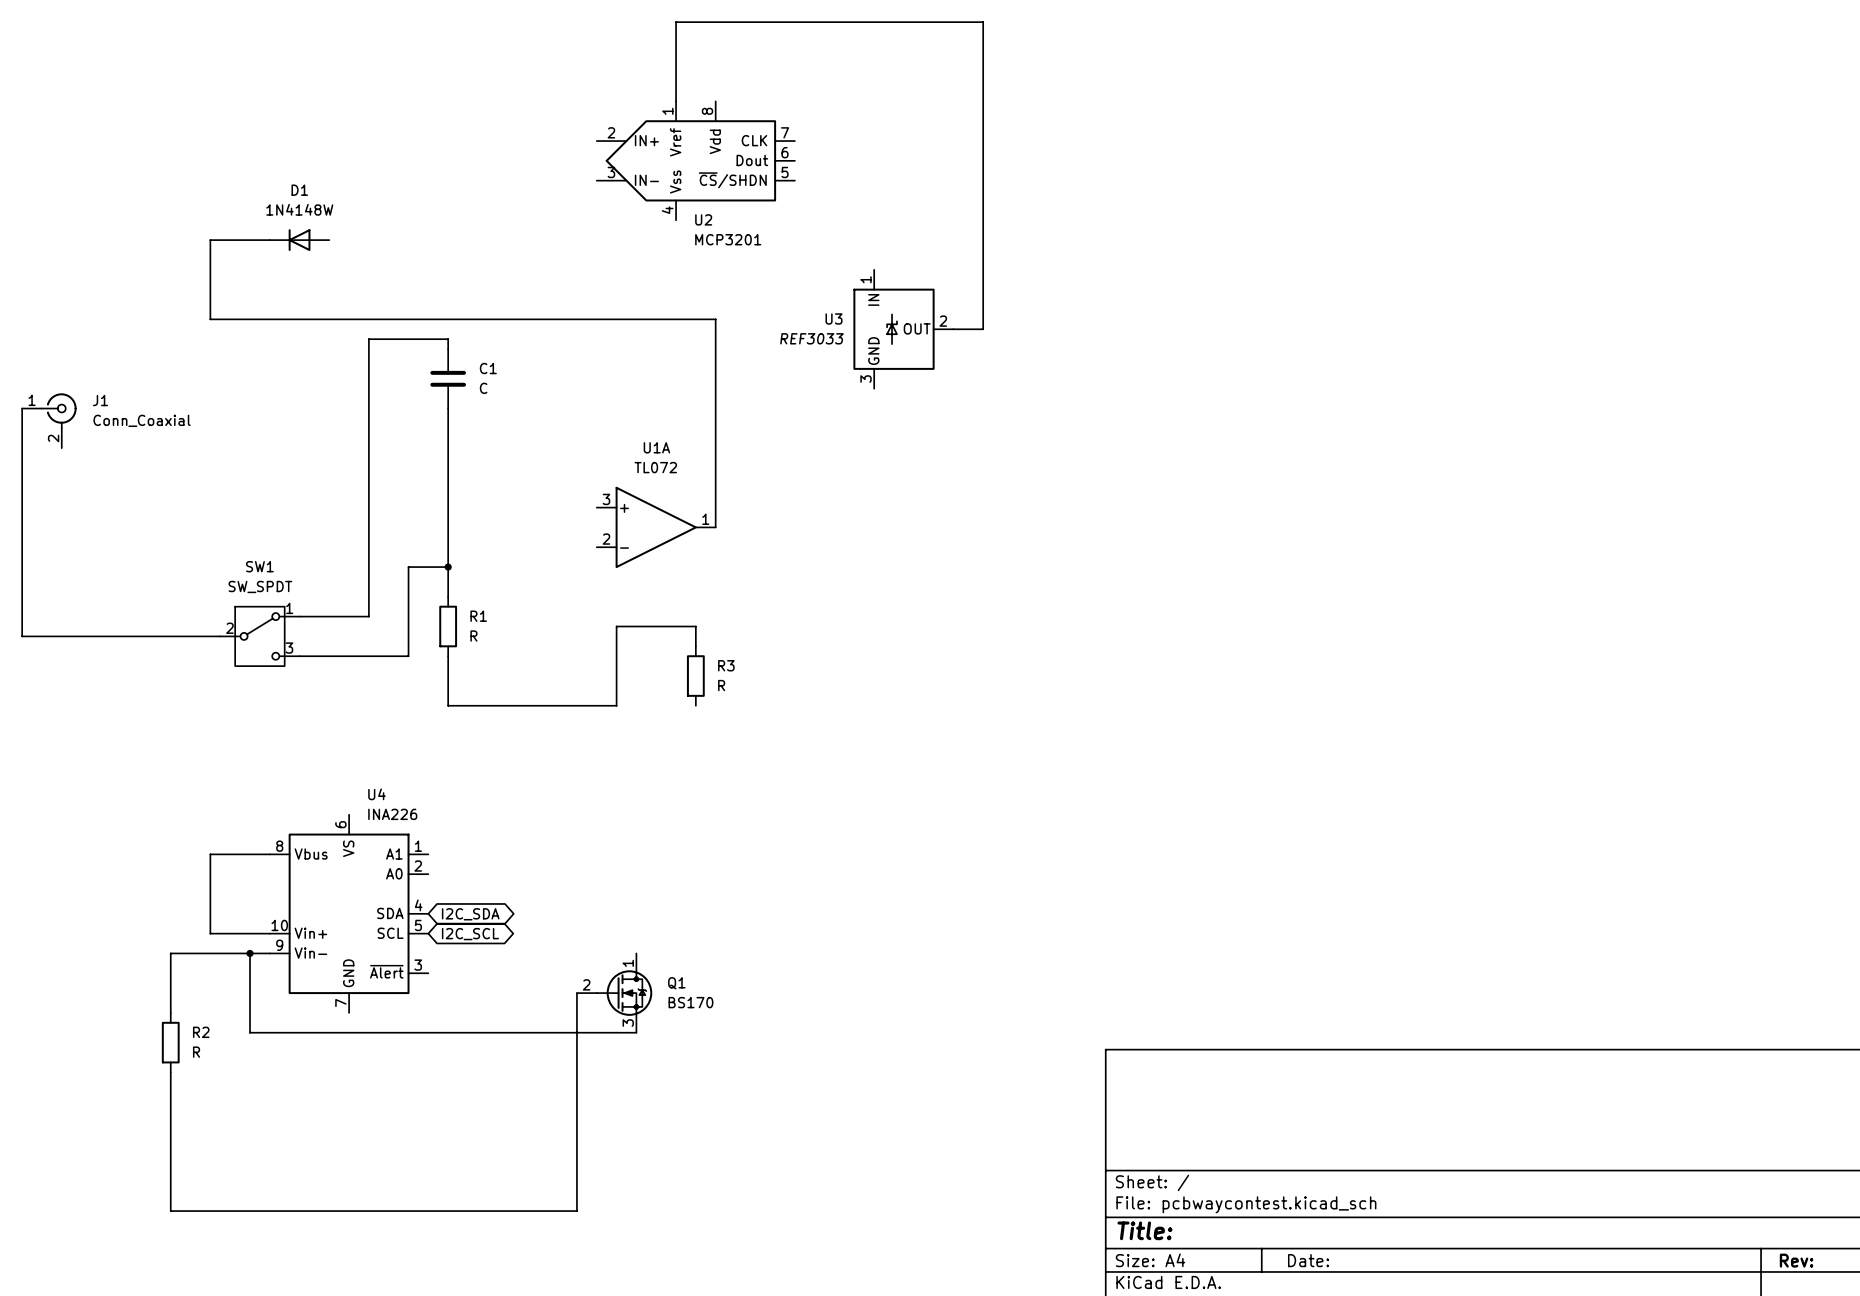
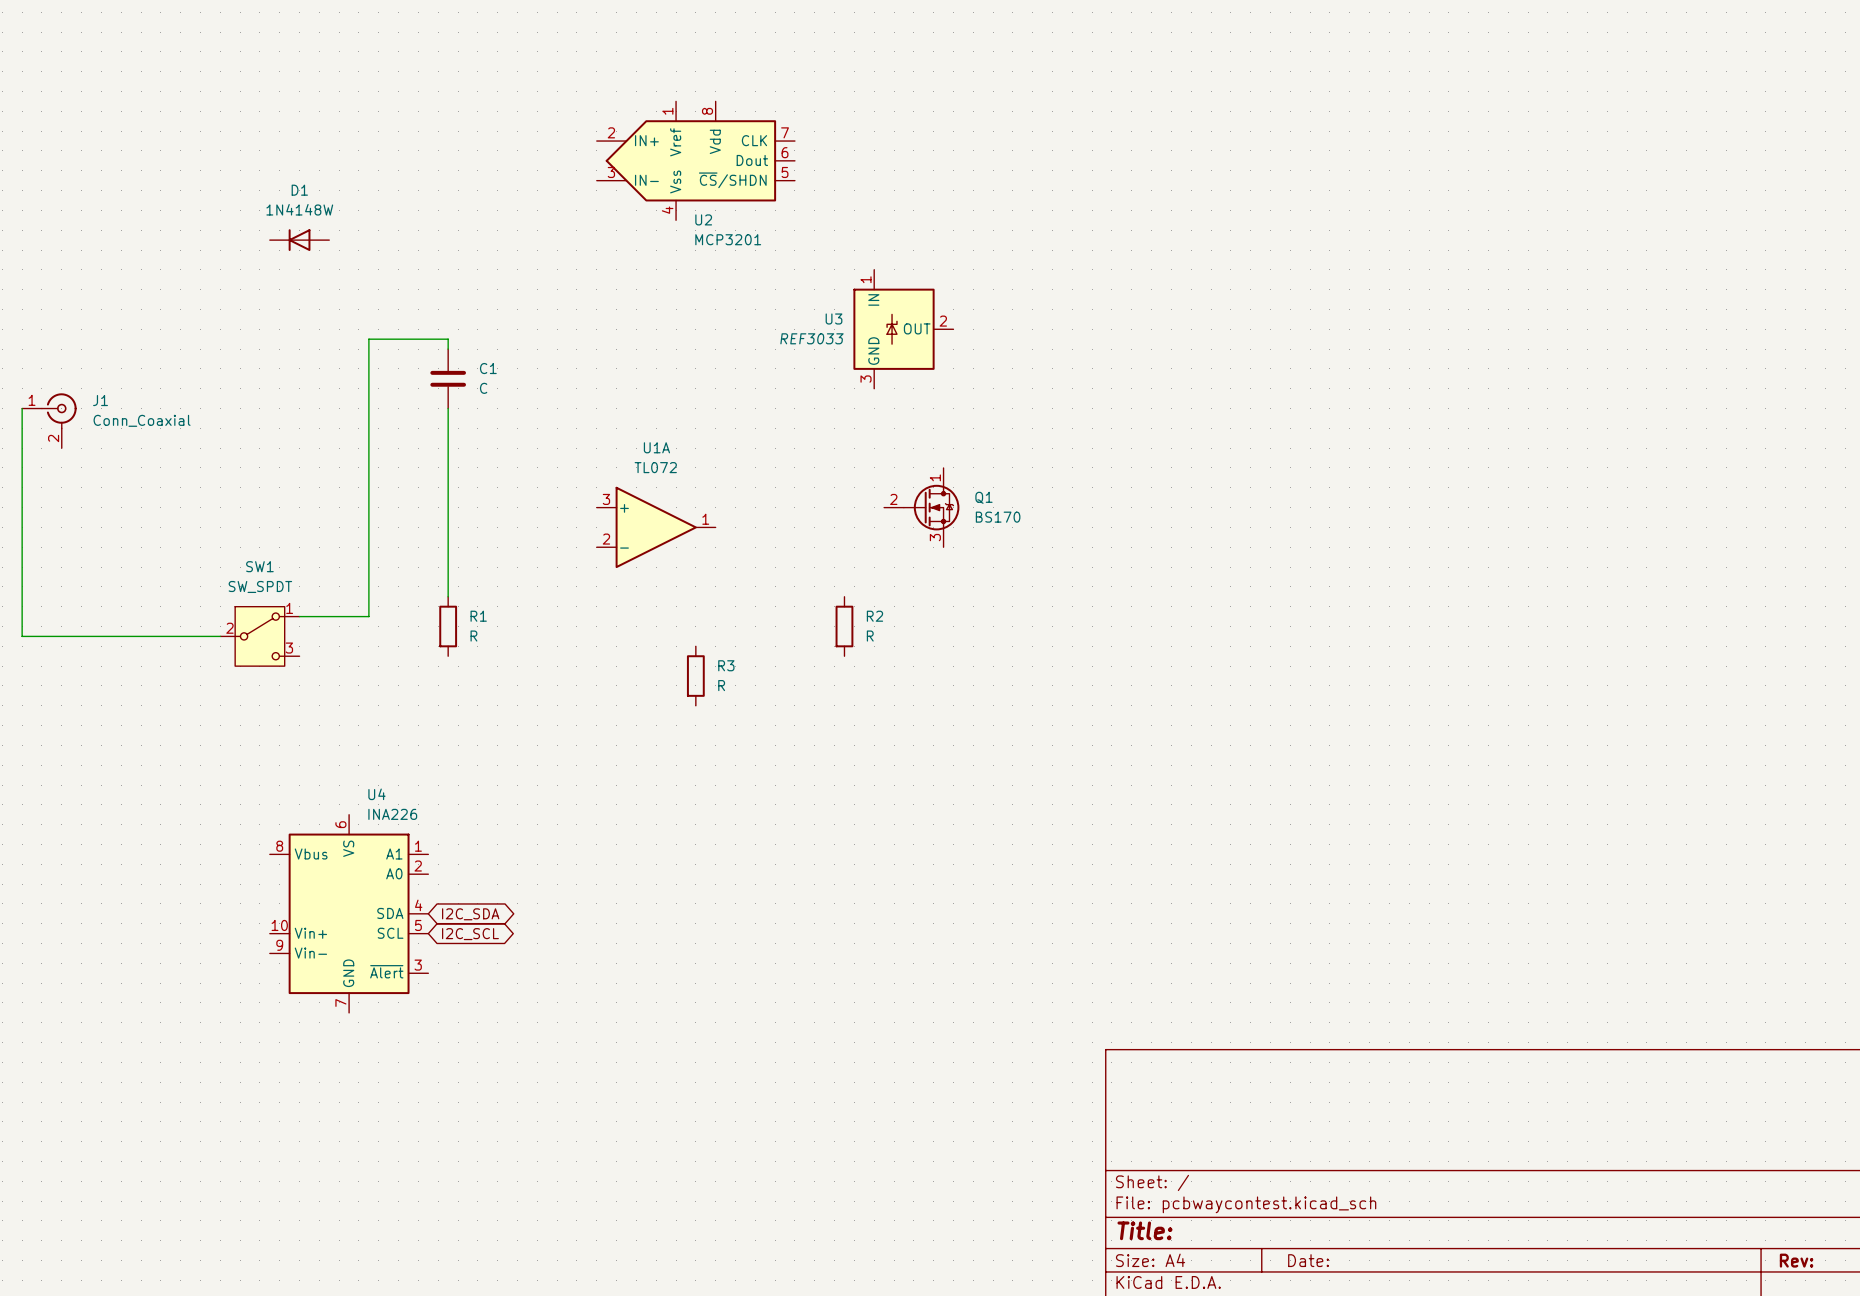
wire: (676, 101) (676, 22) (983, 22) (983, 329) (953, 329) -> none
wire: (269, 240) (210, 240) (210, 319) (715, 319) (715, 527) -> none
wire: (448, 567) (408, 567) (408, 656) (299, 656) -> none
junction: (448, 567) -> none
wire: (695, 646) (695, 626) (616, 626) (616, 705) (448, 705) (448, 656) -> none
wire: (269, 854) (210, 854) (210, 933) (269, 933) -> none
wire: (250, 953) (250, 1032) (636, 1032) -> none
junction: (250, 953) -> none
wire: (269, 953) (170, 953) (170, 1012) -> none
wire: (576, 993) (576, 1211) (170, 1211) (170, 1072) -> none
Q1 position: (614, 993) -> (921, 507)
R2 position: (170, 1042) -> (844, 626)

